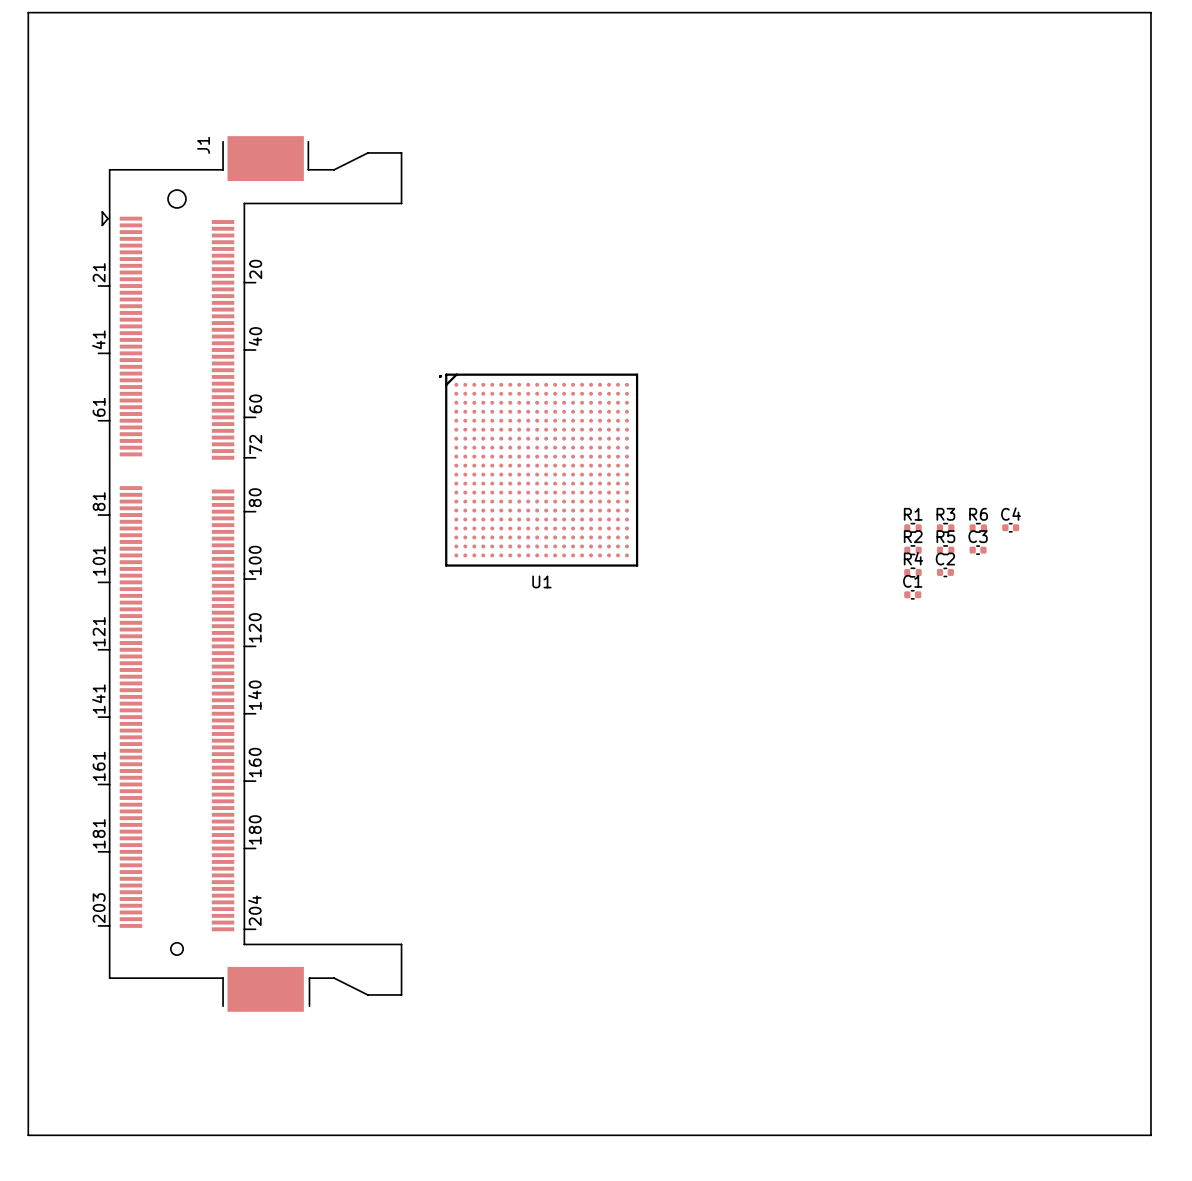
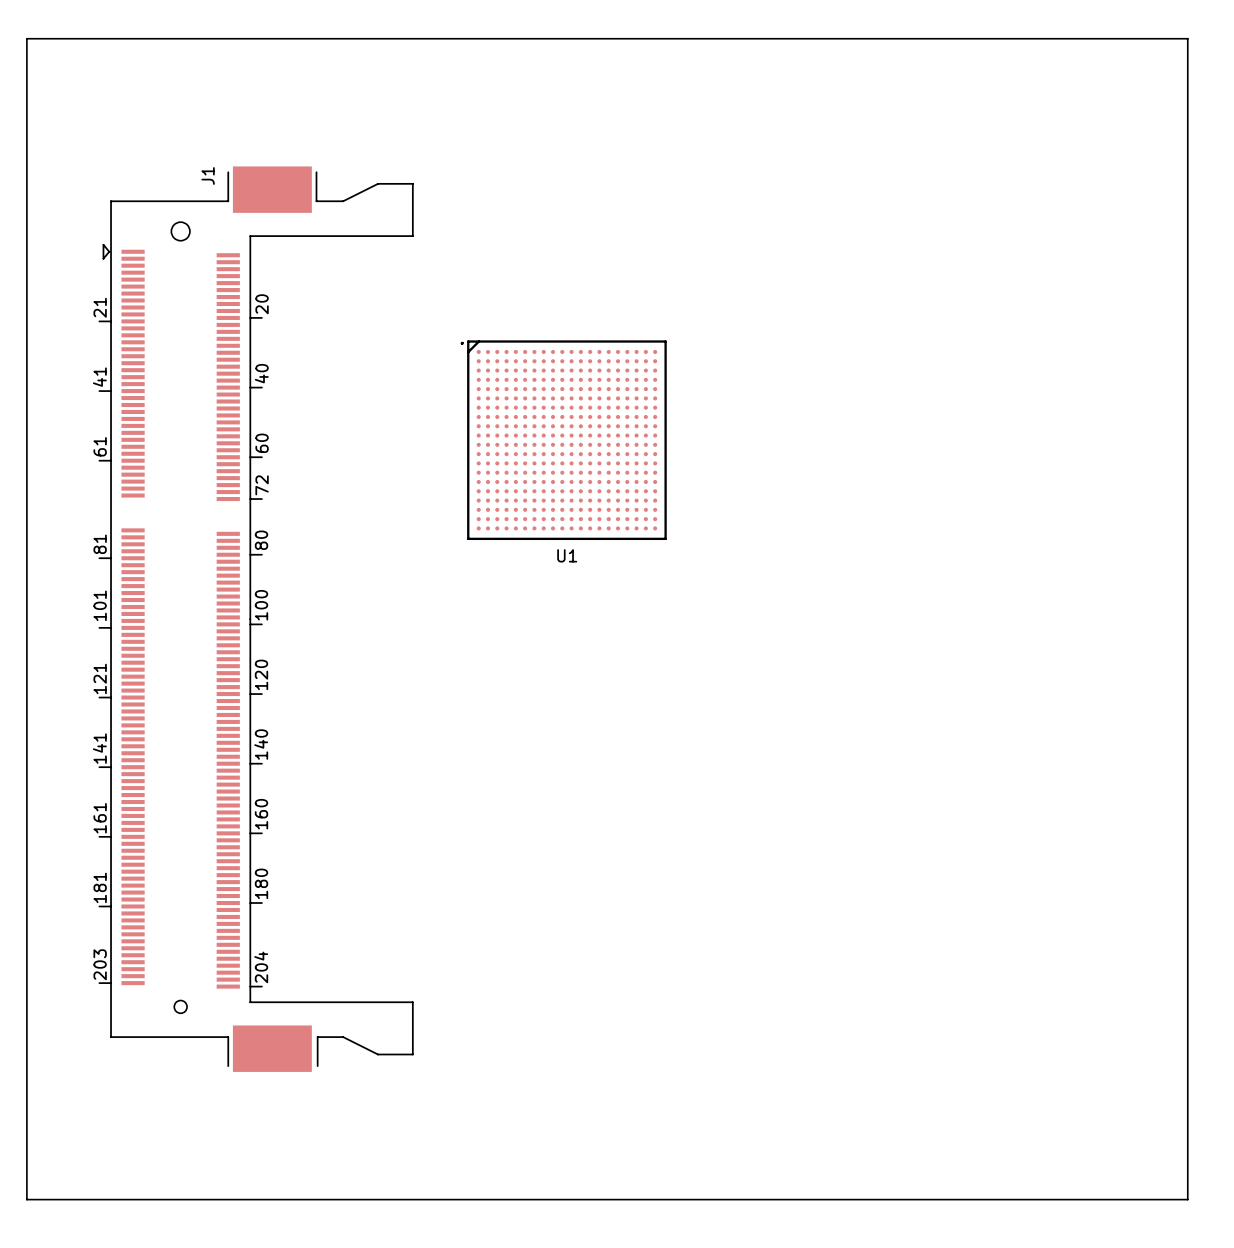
U1 position: (538, 470) -> (563, 440)
R1: (912, 527) -> none
R3: (945, 527) -> none
R6: (978, 527) -> none
C4: (1010, 527) -> none
R2: (912, 550) -> none
R5: (945, 550) -> none
C3: (978, 550) -> none
R4: (912, 572) -> none
C2: (945, 572) -> none
C1: (912, 594) -> none

